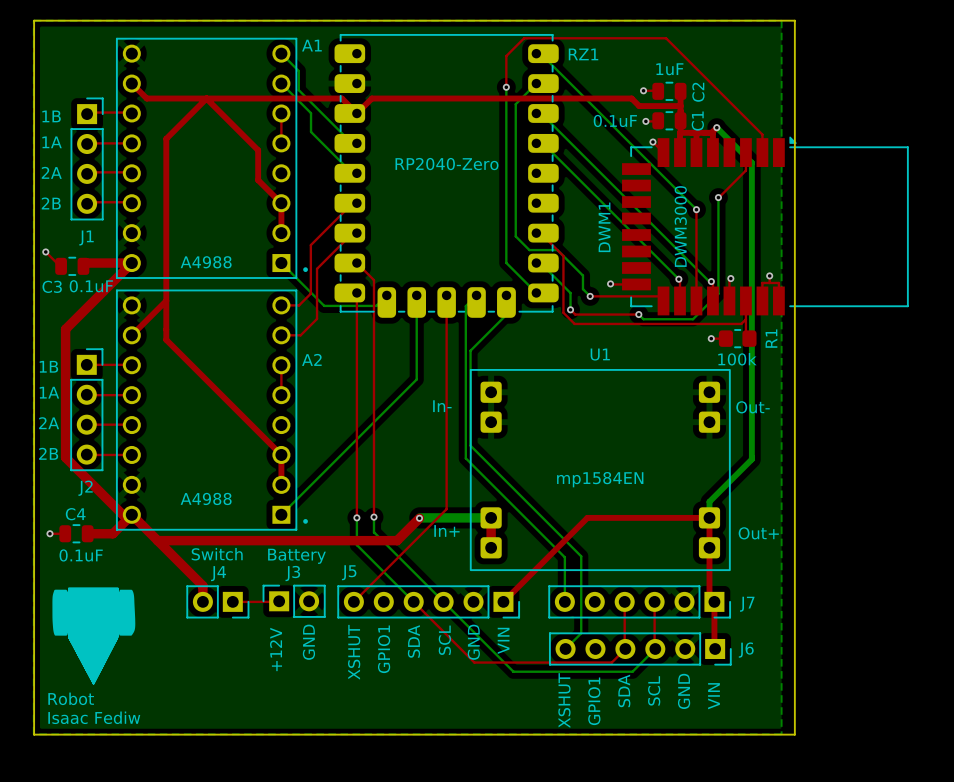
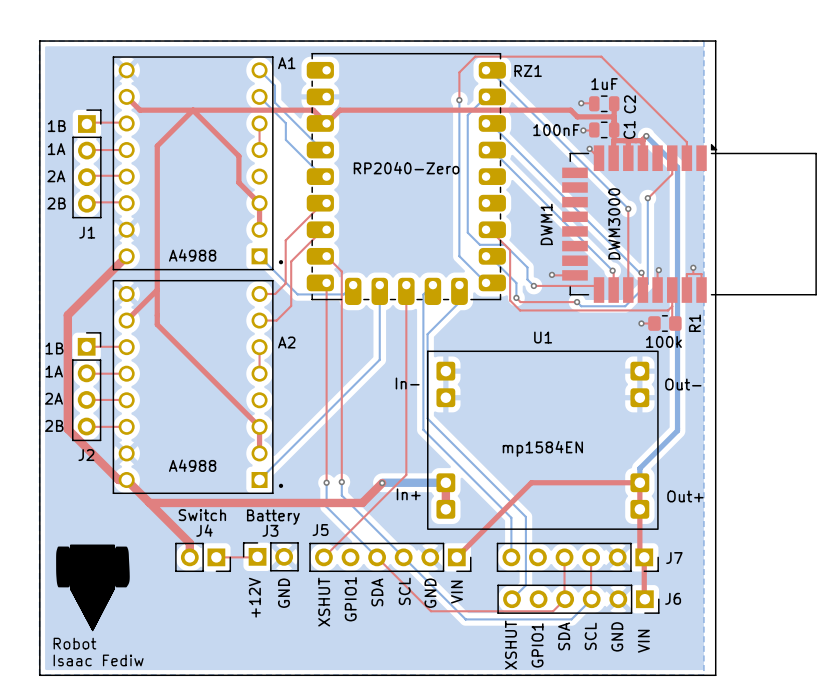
C1 value: 0.1uF (615, 120) -> 100nF (556, 130)
top track: (45, 251) (61, 266) -> none
via: (45, 251) -> none
top track: (131, 263) (86, 263) (83, 266) -> none
C3: 0.1uF (72, 266) -> none
top track: (131, 514) (112, 533) (87, 533) -> none
top track: (49, 533) (65, 533) -> none
via: (49, 533) -> none
C4: 0.1uF (76, 533) -> none

